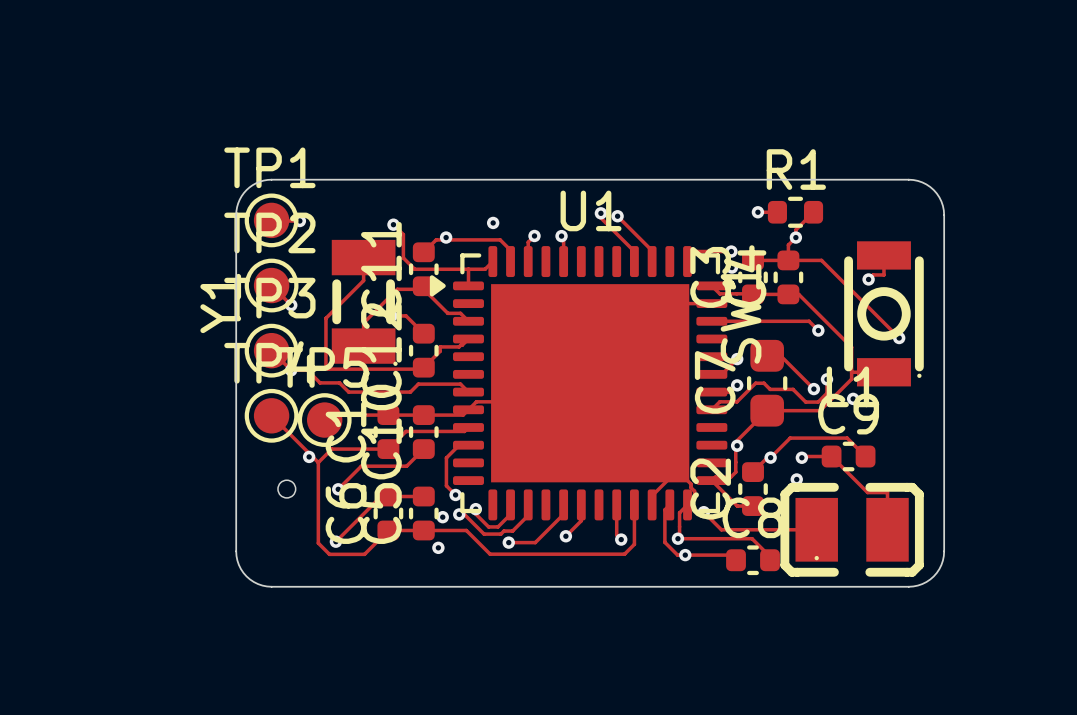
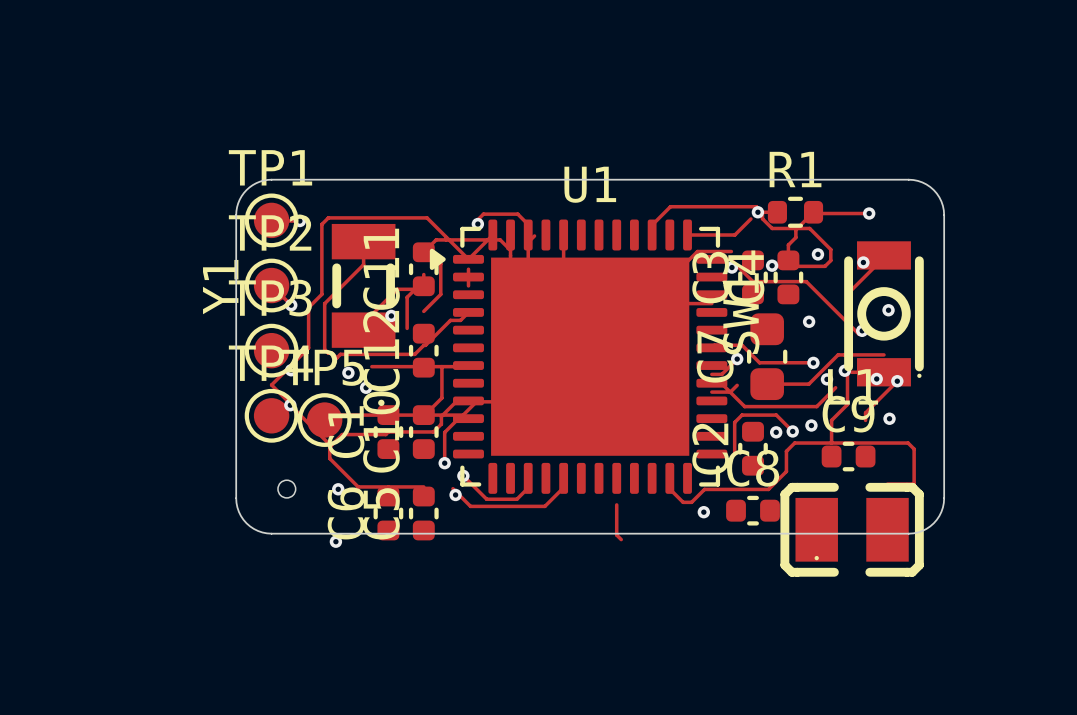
track: none -> (813, 208) (819, 213) (869, 213)
track: (600, 213) (600, 218) (634, 251) (634, 261) -> none
via: (600, 213) -> none
via: none -> (869, 213)
track: (617, 216) (652, 250) (652, 261) -> none
via: (617, 216) -> none
track: none -> (750, 218) (734, 235) (687, 235)
via position: (493, 222) -> (477, 224)
track: (393, 224) (403, 234) (403, 257) (414, 269) (485, 269) (492, 261) -> none
via: (393, 224) -> none
track: none -> (477, 224) (477, 219) (483, 214) (517, 214) (528, 224) (528, 235)
track: none -> (492, 235) (468, 259) (427, 217) (328, 217) (321, 224) (321, 294) (308, 307) (308, 347) (271, 385) (330, 445)
via: (534, 235) -> none
track: none -> (652, 235) (652, 225) (670, 206) (756, 206) (762, 212) (762, 218) (772, 228) (809, 228) (830, 249) (830, 260) (825, 266) (772, 265)
via: (561, 236) -> none
via: (446, 237) -> none
via: (795, 237) -> none
track: none -> (423, 246) (440, 263) (440, 294) (423, 311)
via: (731, 251) -> none
via: none -> (817, 254)
track: (883, 257) (883, 274) (873, 274) (868, 279) -> (883, 257) (850, 291) (850, 295)
track: none -> (711, 259) (730, 259) (753, 281) (806, 281) (858, 333) (861, 330)
track: (753, 260) (821, 260) (899, 338) -> none
track: (363, 264) (363, 280) (325, 318) (325, 367) (328, 369) (422, 369) (440, 351) (440, 346) (459, 346) (468, 338) -> (363, 264) (324, 303) (324, 349) (328, 353) (331, 353) (336, 358) (340, 354) (414, 354) (450, 320)
via: none -> (772, 265)
track: none -> (423, 274) (423, 280) (407, 297) (407, 328)
via position: (868, 279) -> (863, 262)
track: (711, 285) (719, 293) (798, 294) (851, 347) (851, 379) (820, 410) (767, 410) (737, 440) (735, 472) (730, 477) (715, 477) (711, 480) (737, 506) (753, 506) -> none
track: (423, 286) (423, 289) (447, 313) (460, 313) (468, 321) -> none
Y1 position: (364, 302) -> (364, 286)
via: none -> (888, 310)
track: none -> (468, 312) (460, 320) (450, 320)
track: (391, 315) (406, 315) (423, 333) -> none
track: (711, 321) (809, 321) (818, 330) -> none
via position: (818, 330) -> (809, 321)
via: none -> (862, 330)
via: (899, 338) -> none
track: none -> (711, 347) (714, 345) (742, 345) (759, 362) (813, 362)
track: (271, 350) (291, 370) (307, 370) (320, 382) (339, 382) (348, 392) (410, 392) (418, 384) (460, 384) (468, 392) -> none
track: none -> (883, 354) (838, 354) (808, 384) (767, 384)
track: (767, 355) (780, 355) (813, 389) -> none
via: none -> (813, 362)
track: none -> (468, 365) (371, 366)
track: none -> (441, 366) (441, 398) (423, 416)
track: none -> (844, 370) (847, 373) (847, 404) (831, 420) (831, 443)
via: none -> (844, 370)
via: none -> (348, 372)
via: none -> (876, 378)
track: (826, 379) (826, 393) (818, 402) (805, 402) (793, 389) (770, 389) (763, 383) (755, 383) (737, 401) (719, 401) (711, 409) -> none
track: none -> (897, 381) (865, 412) (865, 420)
via: none -> (897, 381)
U1 position: (578, 383) -> (578, 356)
track: none -> (711, 383) (721, 383) (744, 406) (816, 406) (835, 387)
C7 position: (767, 383) -> (767, 356)
via: (737, 385) -> none
via: none -> (366, 387)
via: (813, 389) -> none
via: (853, 398) -> none
track: none -> (468, 400) (456, 400) (441, 416) (441, 424) (433, 431) (342, 434) (329, 447) (329, 458) (358, 486) (423, 486)
via: none -> (290, 405)
track: (271, 415) (309, 453) (309, 456) (312, 456) (318, 462) -> none
track: none -> (468, 418) (458, 418) (444, 432) (444, 463)
via: none -> (889, 418)
via: none -> (811, 425)
track: (468, 427) (464, 431) (406, 431) (388, 449) (331, 449) (318, 462) -> none
track: none -> (792, 431) (776, 415) (742, 415) (734, 422) (734, 454)
via: none -> (792, 431)
via: none -> (776, 432)
track: (468, 445) (459, 445) (446, 457) (446, 485) (455, 494) -> none
via: (737, 445) -> none
track: (423, 449) (406, 466) (361, 466) (338, 489) -> none
via: (309, 456) -> none
track: (865, 456) (847, 438) (790, 438) (753, 472) -> none
via: (770, 457) -> none
track: (801, 457) (831, 456) (867, 492) (887, 492) (887, 529) -> none
via: (801, 457) -> none
track: (318, 462) (318, 543) (329, 554) (364, 554) (388, 530) (466, 530) (490, 554) (624, 554) (634, 544) (634, 504) -> none
via: none -> (444, 463)
track: none -> (463, 475) (486, 499) (516, 499) (528, 487) (528, 478)
via: none -> (463, 475)
track: none -> (563, 478) (563, 487) (544, 506) (470, 506) (452, 488)
track: none -> (669, 478) (669, 489) (683, 502) (691, 502) (704, 489) (768, 489) (786, 471) (786, 451) (794, 443) (908, 443) (914, 449) (914, 484) (887, 484)
via: (796, 479) -> none
C2 position: (753, 489) -> (753, 448)
track: (423, 496) (381, 496) (335, 541) -> none
board edge: (236, 498) (236, 551) (238, 564) (246, 576) (253, 582) (271, 586) (913, 586) (930, 579) (941, 564) (944, 551) (944, 498) -> (236, 498) (238, 511) (246, 523) (258, 530) (271, 533) (908, 533) (922, 530) (933, 523) (941, 511) (944, 498)
track: (510, 504) (510, 514) (497, 526) (488, 526) (475, 514) (475, 509) -> none
track: (528, 504) (528, 515) (512, 531) (503, 531) (500, 534) (484, 534) (464, 514) (459, 514) -> none
track: (563, 504) (563, 514) (535, 542) (508, 542) -> none
track: (581, 504) (581, 520) (565, 536) -> none
track: (652, 504) (652, 495) (674, 473) (680, 473) (691, 484) (691, 487) (694, 491) (694, 497) (679, 512) (679, 538) -> none
track: (669, 504) (664, 509) (664, 542) (677, 555) (731, 555) (736, 559) -> none
via: (475, 509) -> none
track: (703, 512) (721, 529) (816, 529) -> none
via: (459, 514) -> none
via: (442, 517) -> none
via: (565, 536) -> none
track: (677, 538) (752, 538) (769, 556) (769, 560) -> none
via: (677, 538) -> none
via: (621, 539) -> none
via: (508, 542) -> none
via: (438, 547) -> none
via: (685, 555) -> none
C8 position: (753, 560) -> (753, 510)

